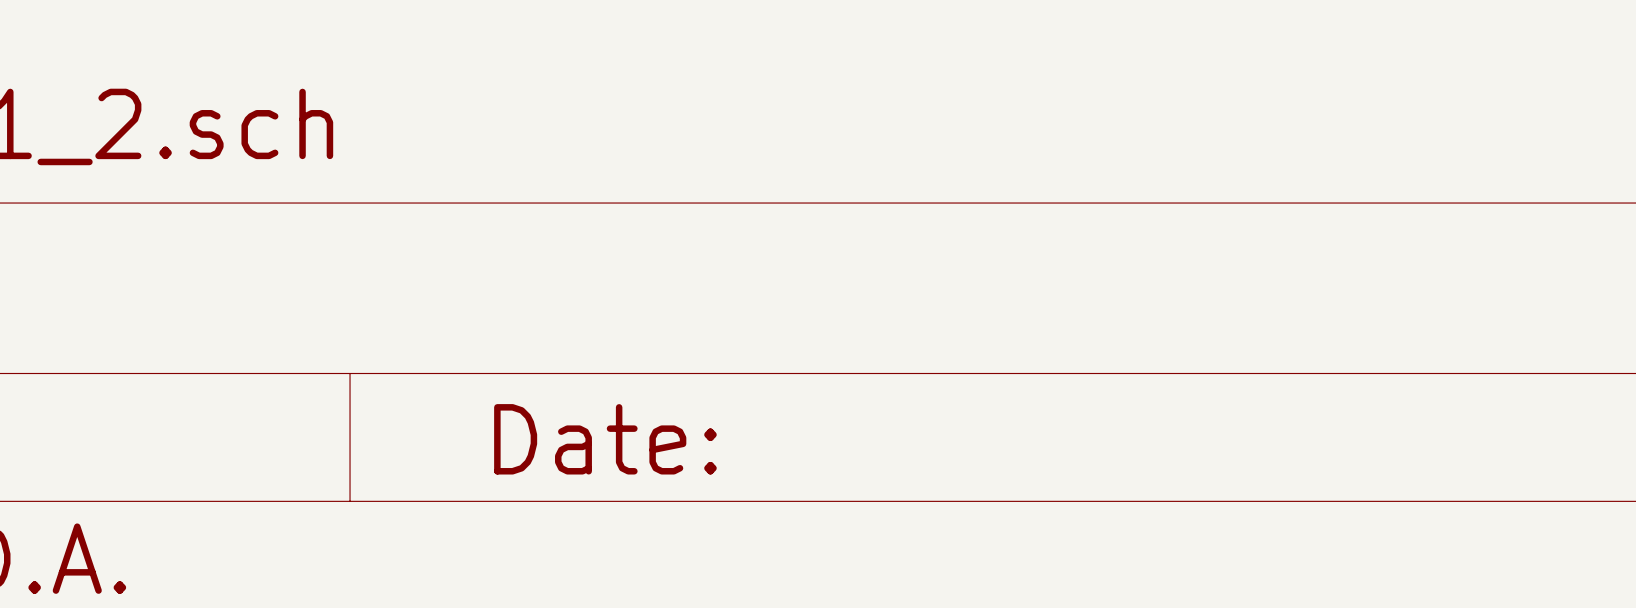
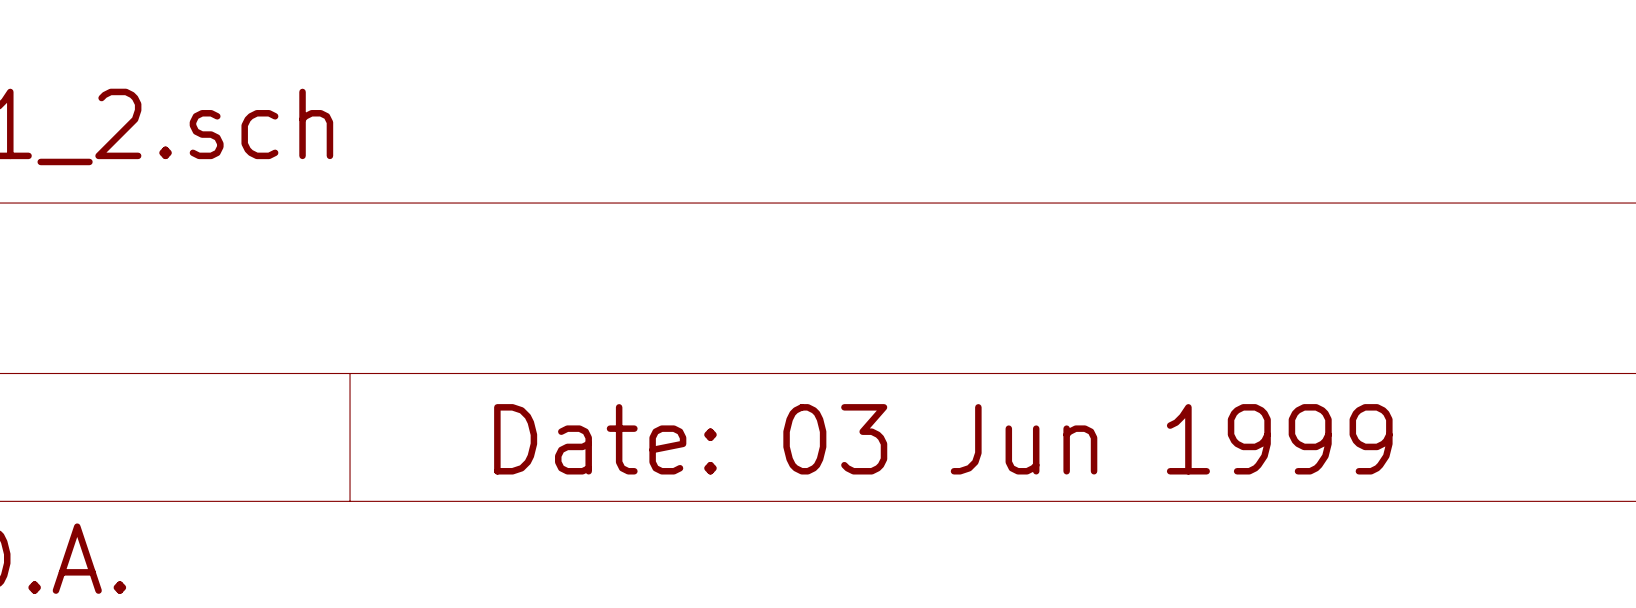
title block: Date: (605, 439) -> Date: 03 Jun 1999 (943, 439)

